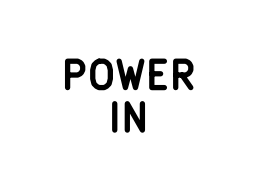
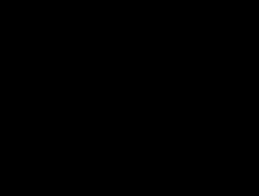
text: POWER (129, 74) -> none
text: IN (128, 116) -> none

